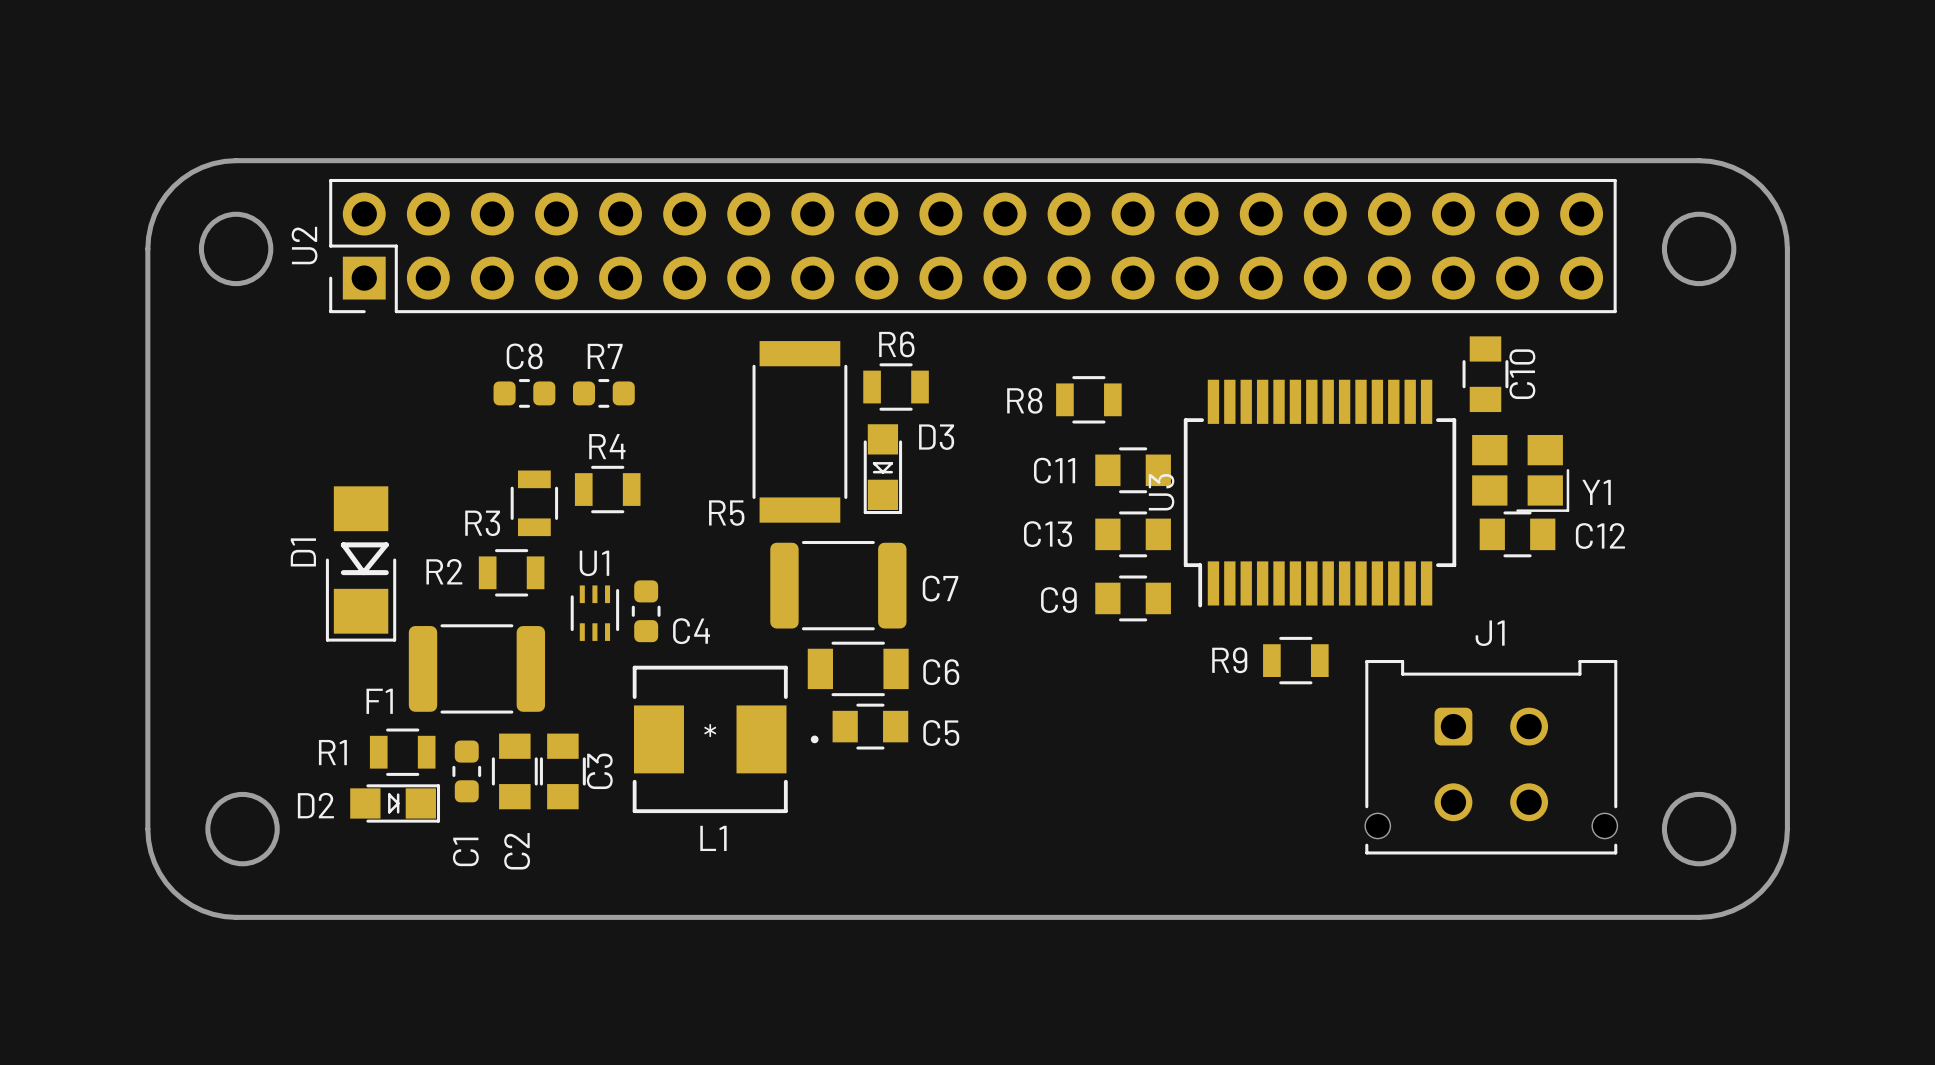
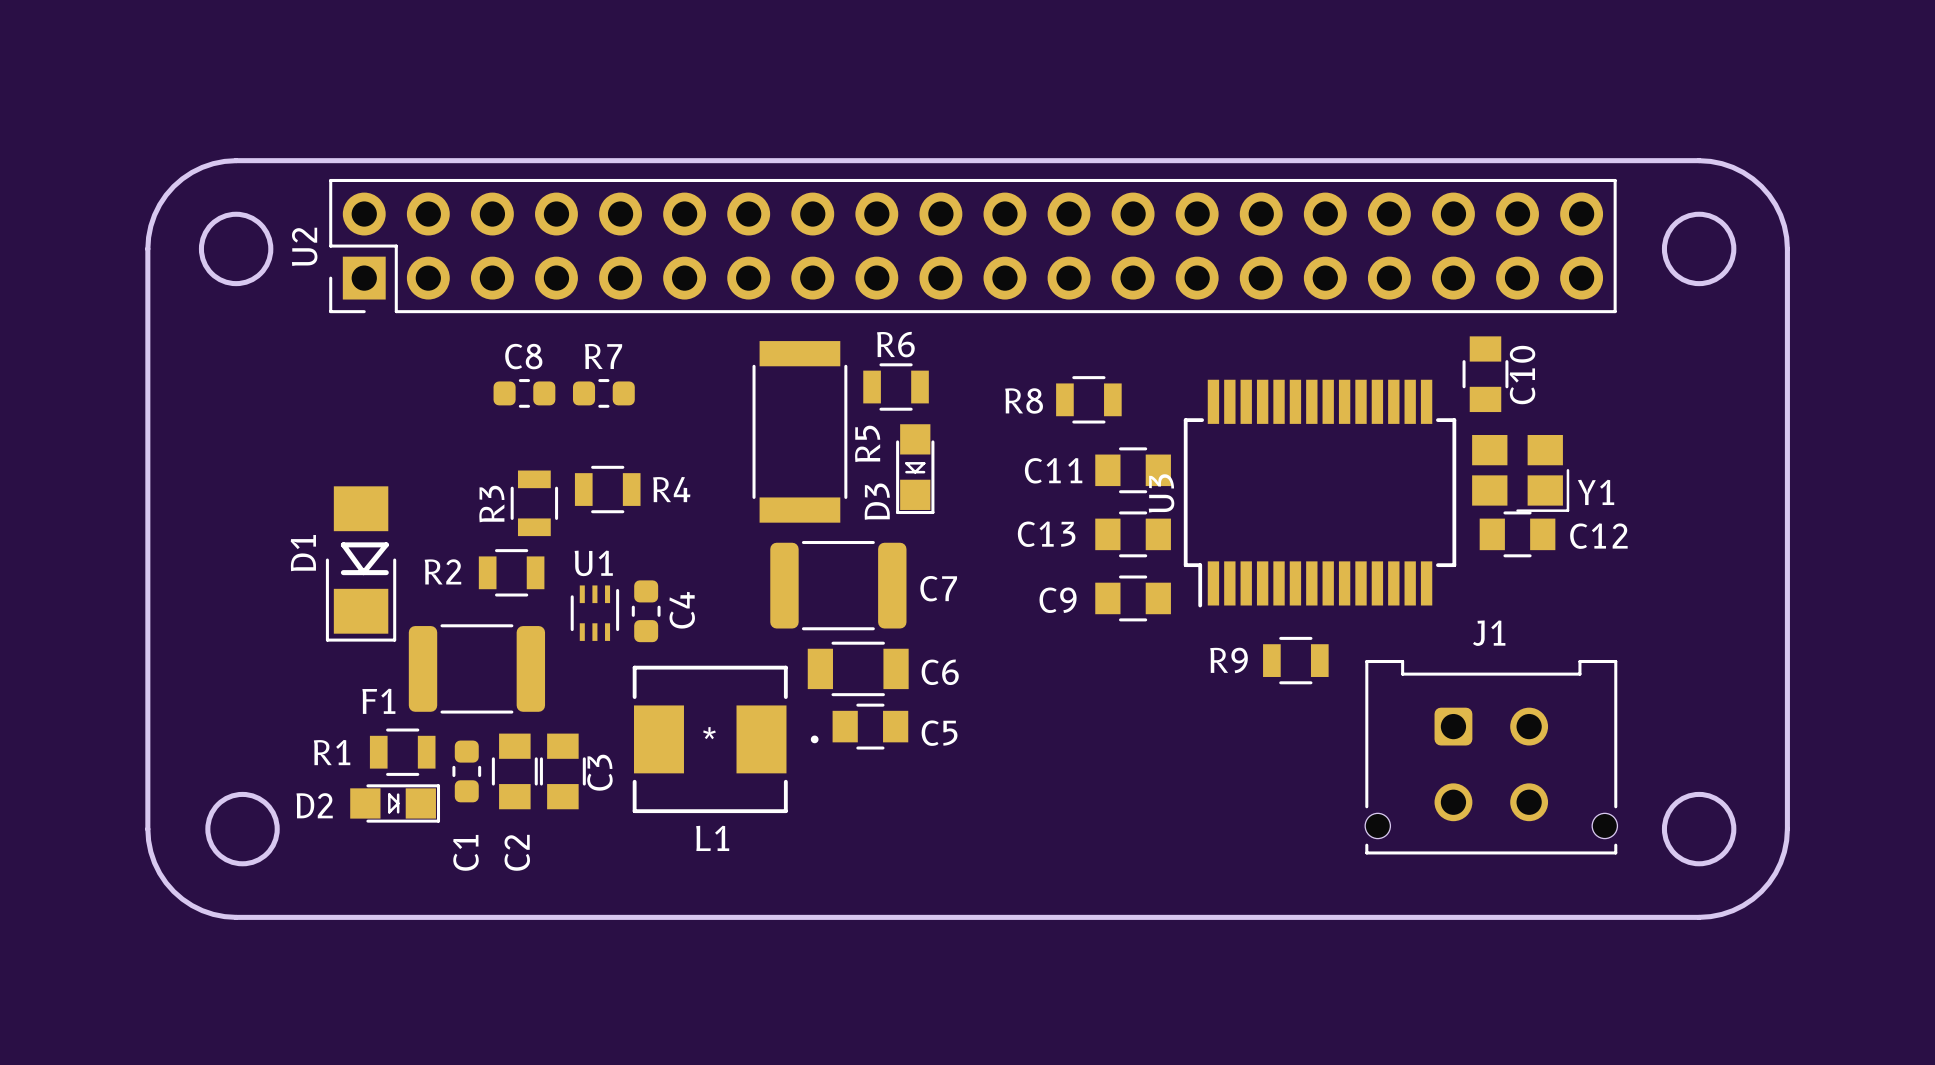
D3 name rotation: 0° (936, 437) -> 90° counterclockwise (877, 501)
D3 name position: D3 (936, 437) -> D3 (877, 501)
R4 name position: R4 (607, 446) -> R4 (671, 489)
D3 position: (882, 469) -> (915, 469)
R5 name rotation: 0° (726, 513) -> 90° counterclockwise (867, 443)
R5 name position: R5 (726, 513) -> R5 (867, 443)
R3 name rotation: 0° (482, 523) -> 90° counterclockwise (491, 504)
C4 name rotation: 0° (691, 631) -> 90° counterclockwise (682, 610)

